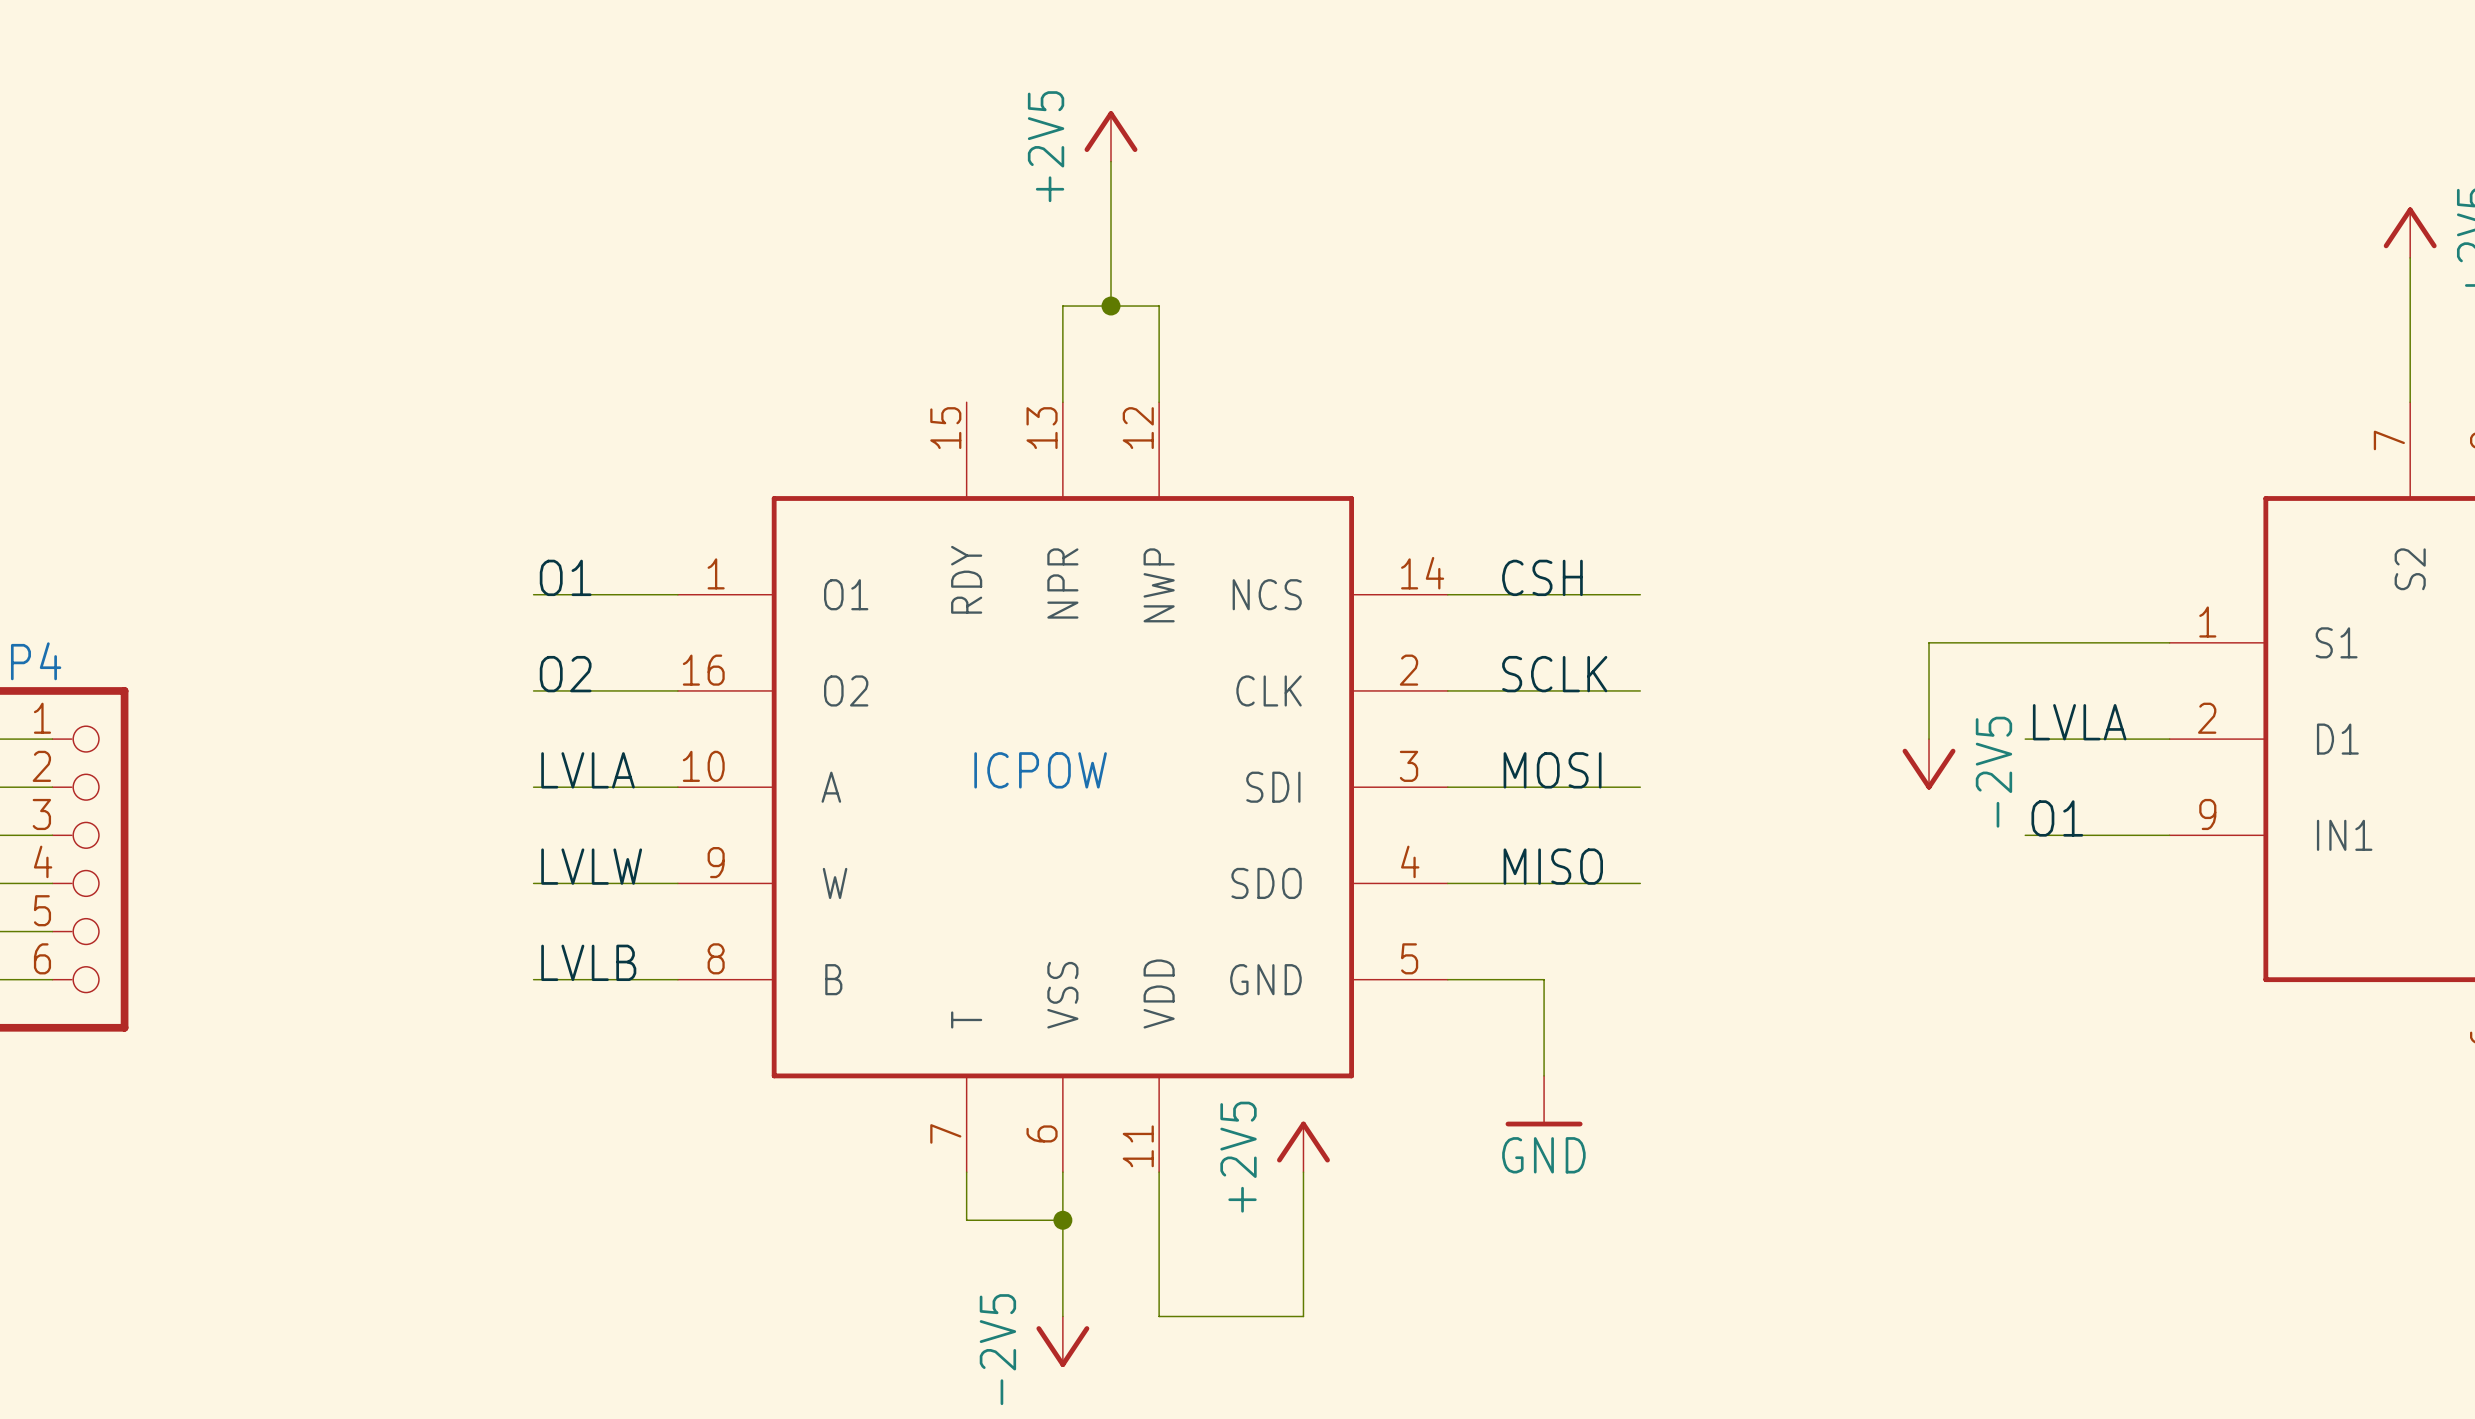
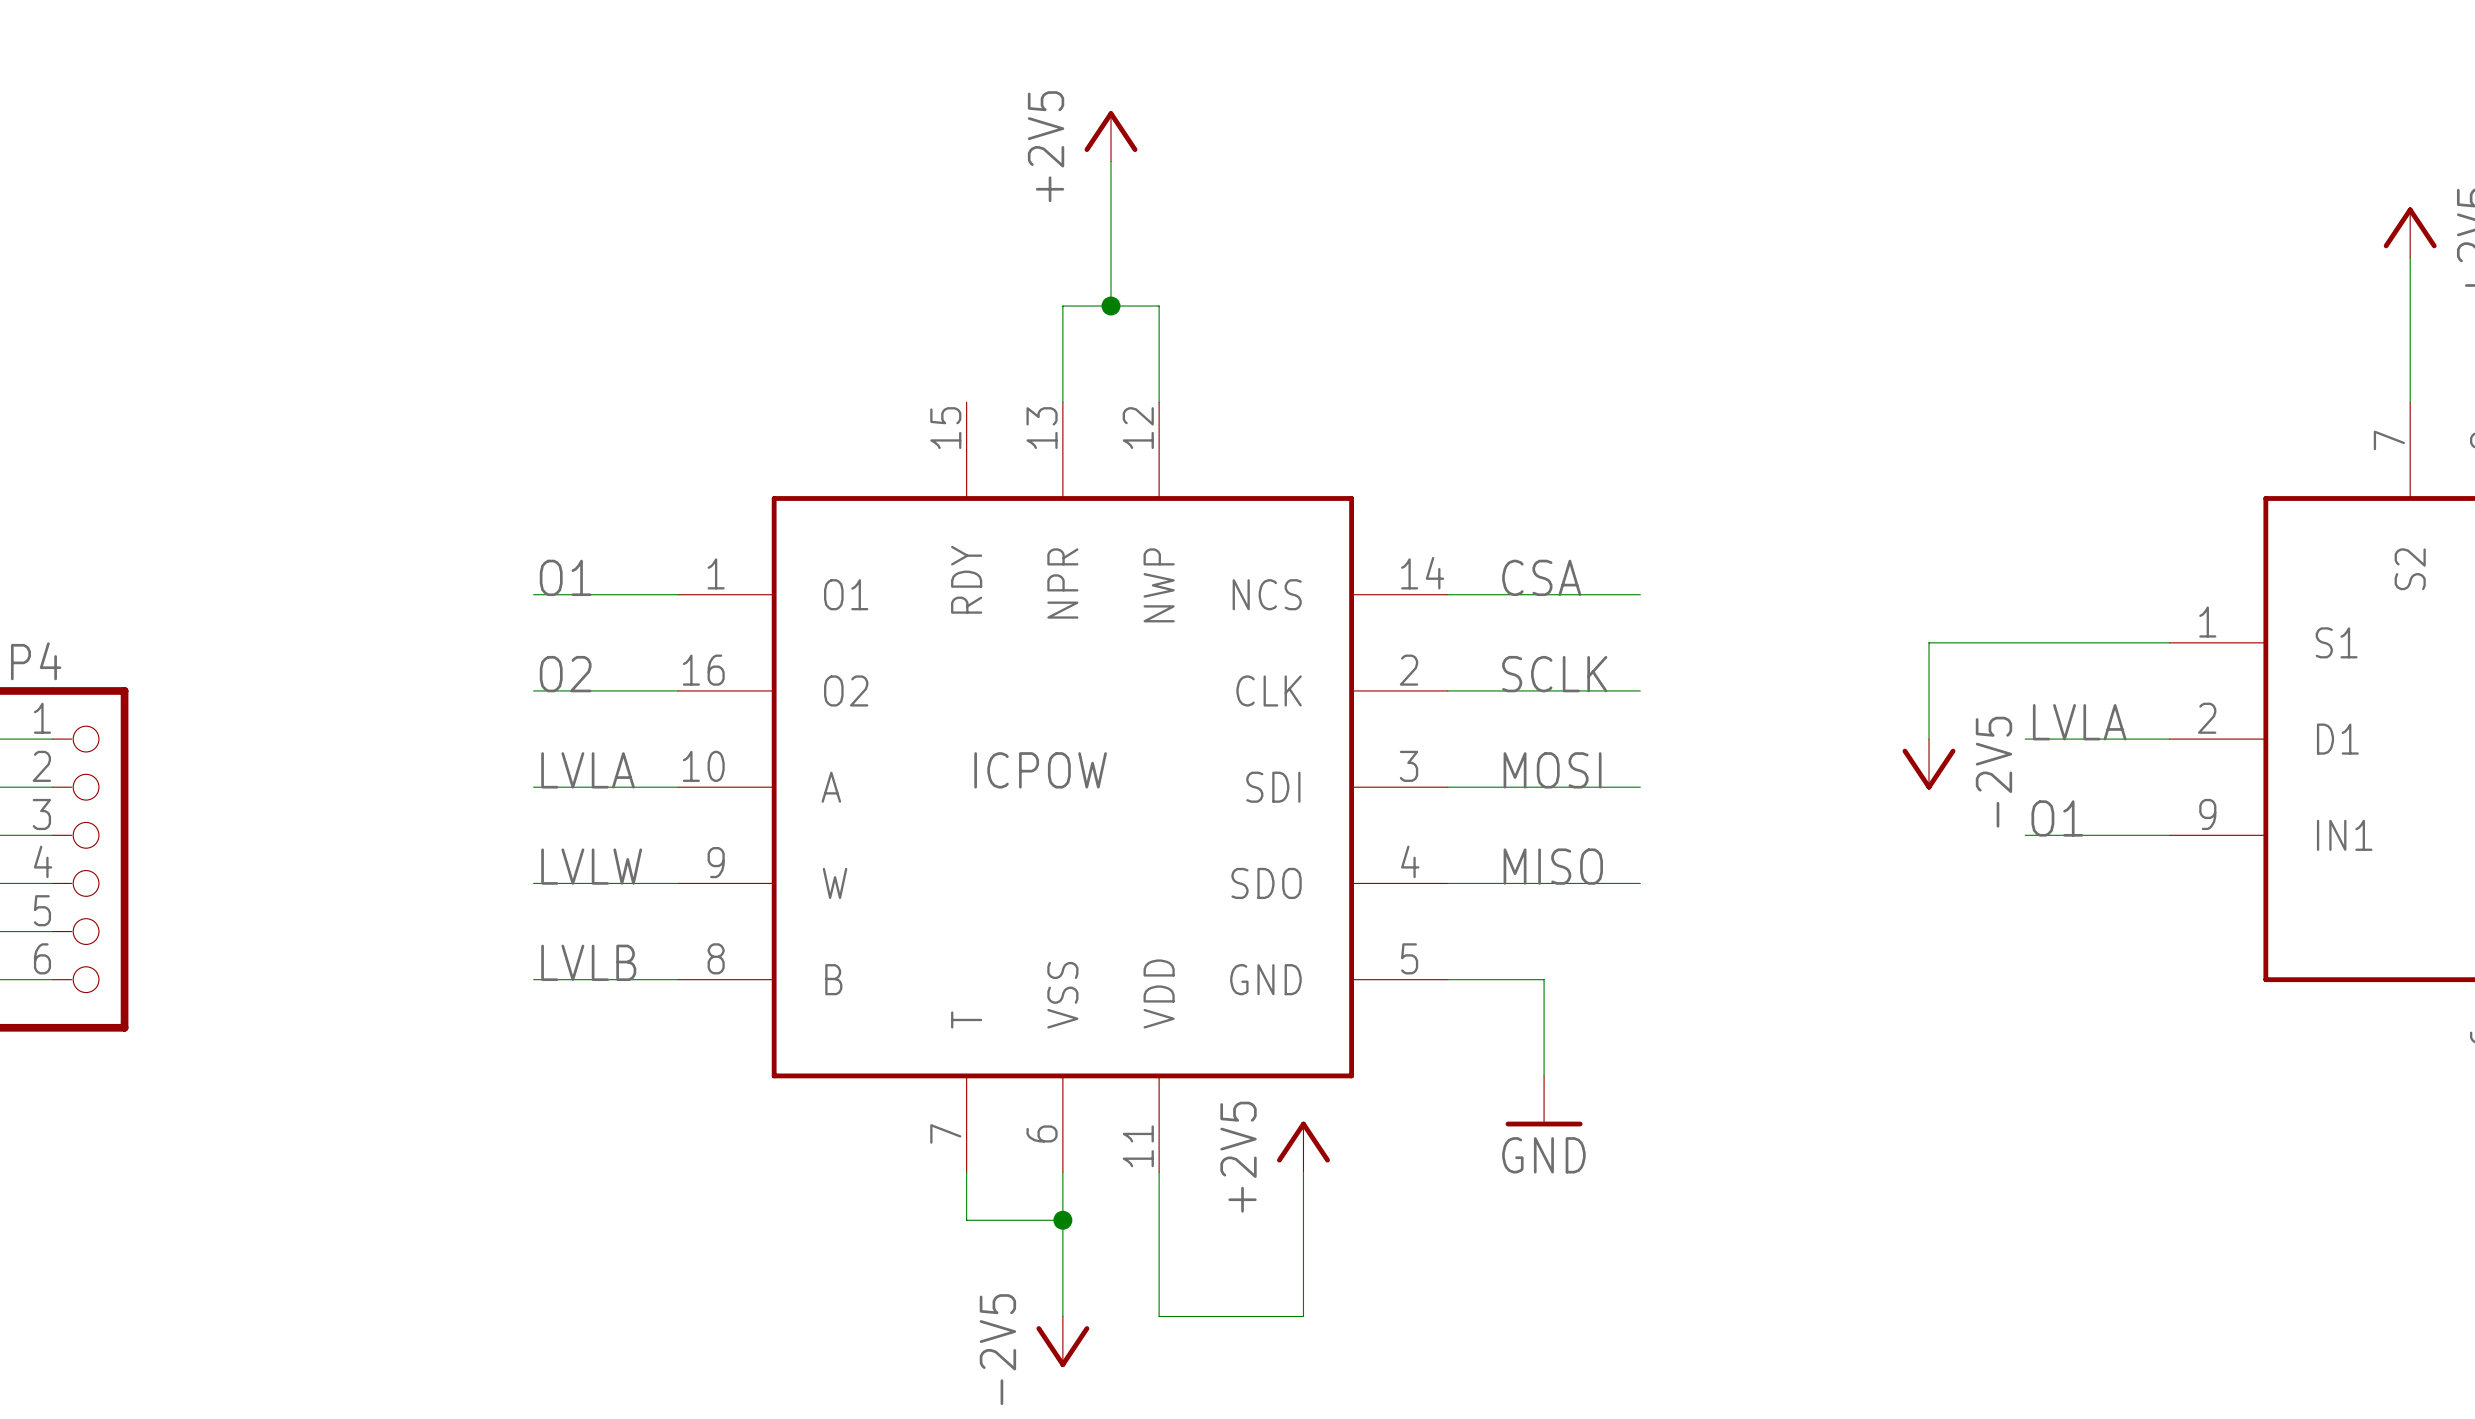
label: CSH (1542, 577) -> CSA (1541, 577)

